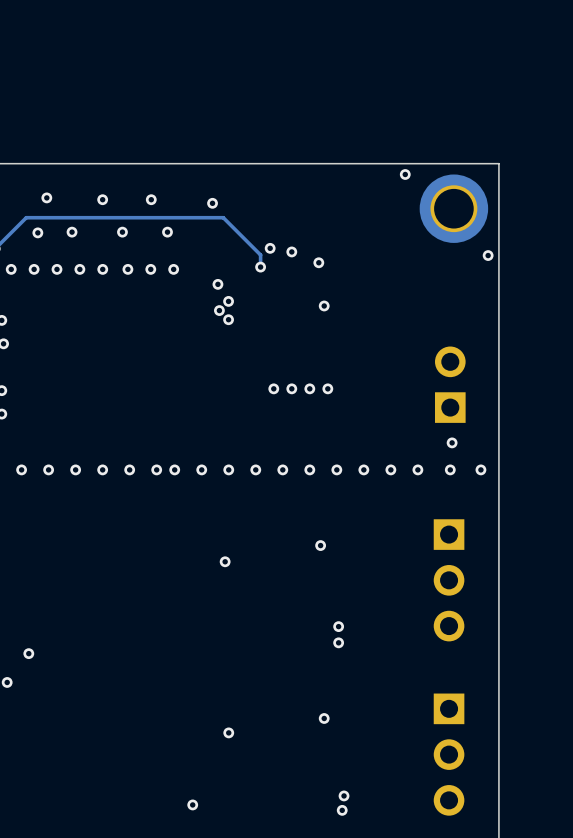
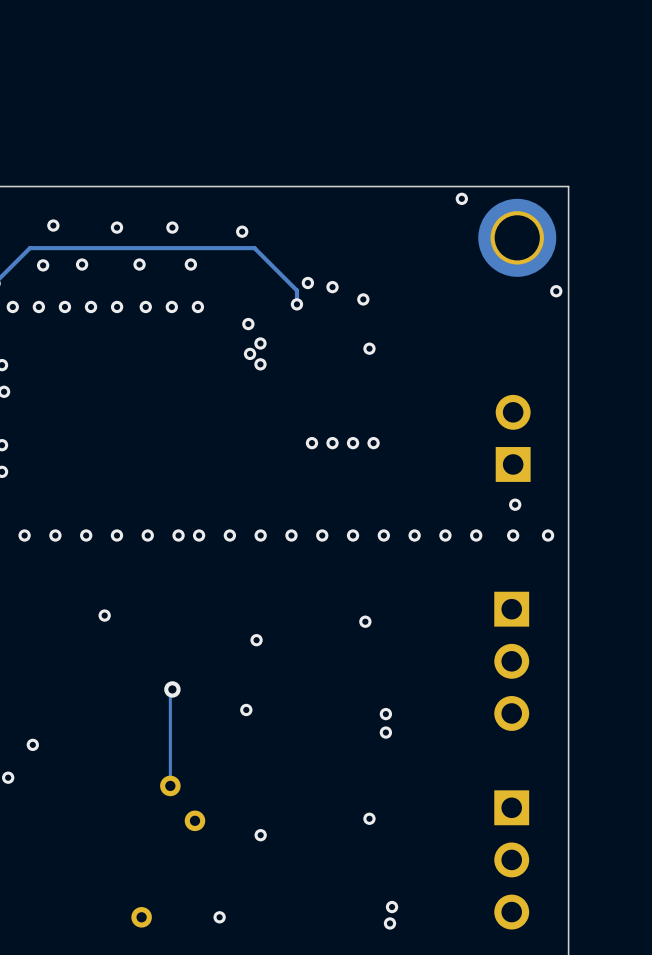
via: none -> (104, 615)
track: none -> (172, 689) (170, 691) (170, 785)
via: none -> (172, 689)
via: none -> (246, 709)
part: none -> (170, 785)
part: none -> (194, 820)
part: none -> (141, 917)

